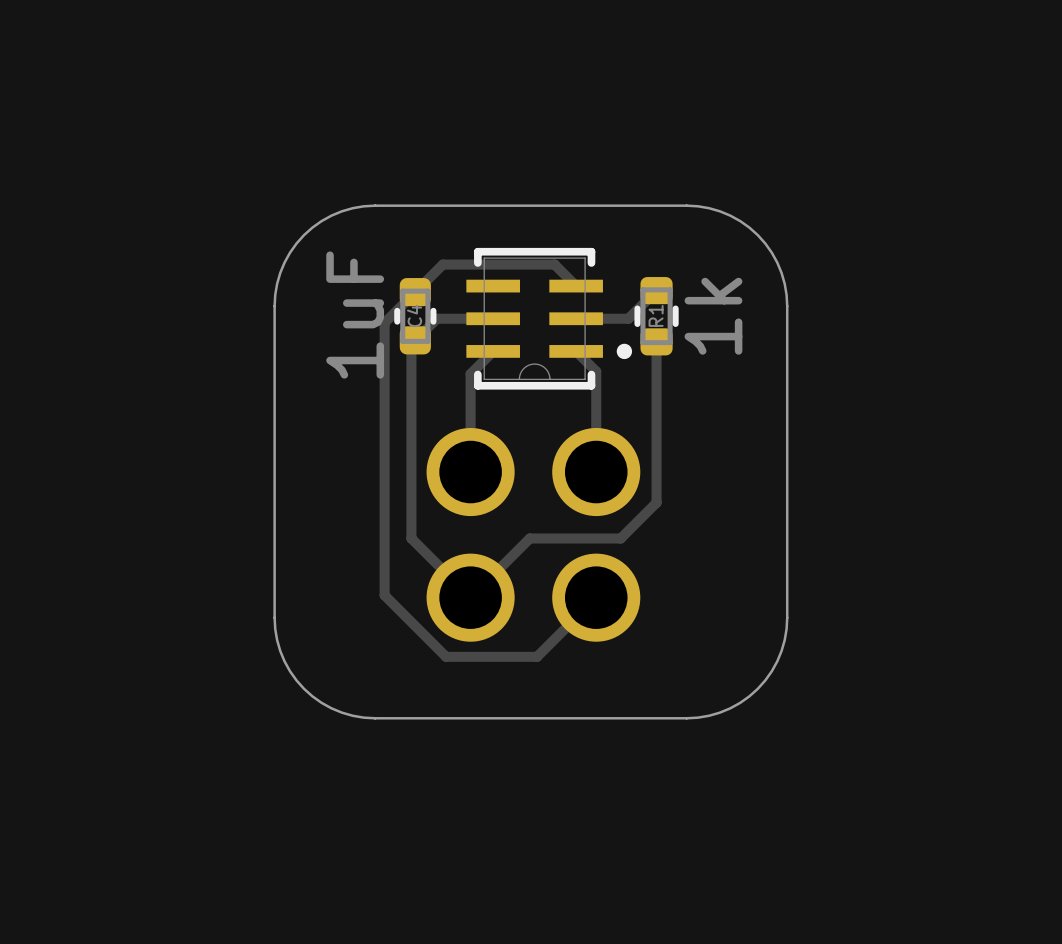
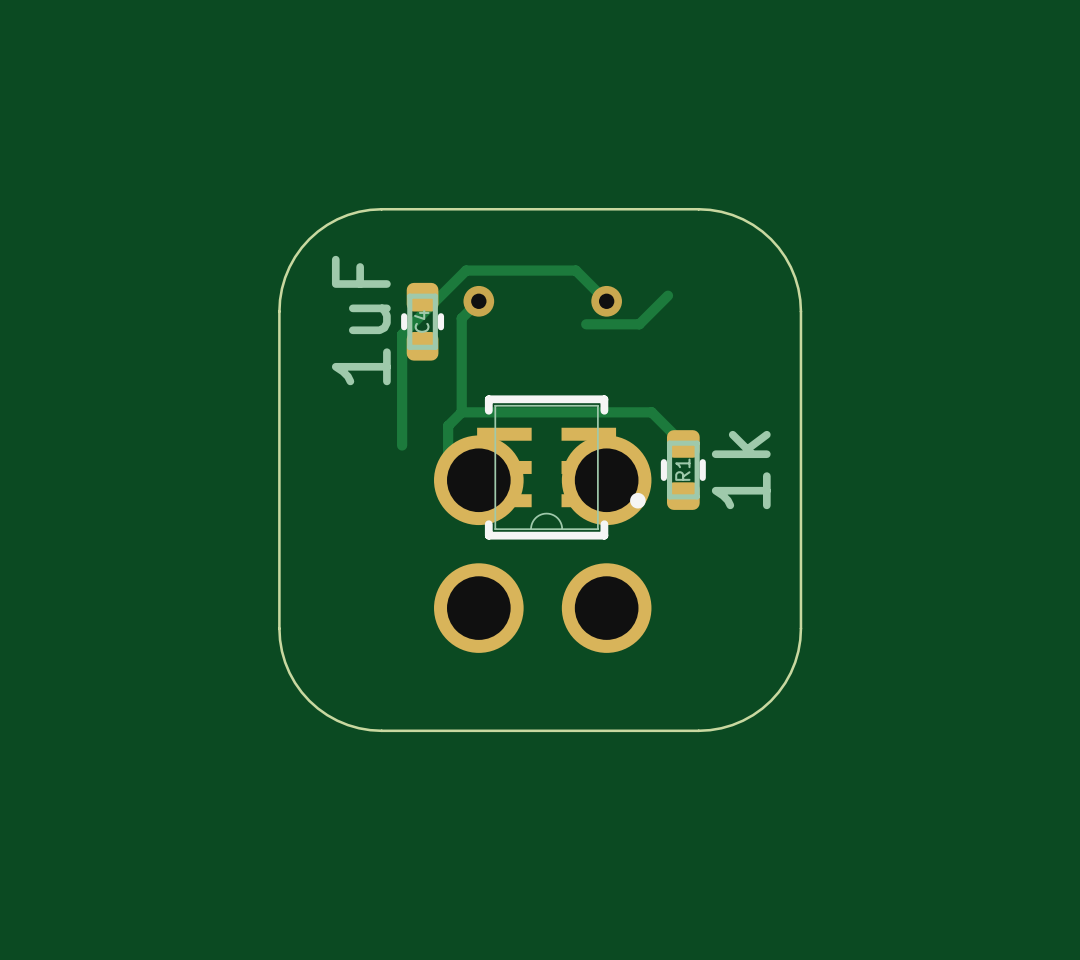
track: (576, 286) (554, 264) (442, 264) (384, 322) (384, 595) (446, 656) (537, 656) (596, 597) -> none
track: none -> (478, 301) (461, 318) (461, 412)
via: none -> (478, 301)
track: none -> (606, 301) (575, 270) (466, 270) (402, 334) (402, 445)
via: none -> (606, 301)
R1 position: (656, 316) -> (683, 470)
track: (493, 318) (436, 318) (411, 344) (411, 538) (470, 597) (529, 538) (620, 538) (656, 502) (656, 341) -> none
part position: (549, 318) -> (561, 467)
track: (493, 351) (470, 373) (470, 472) -> none
track: (576, 351) (596, 371) (596, 472) -> none
track: none -> (461, 412) (651, 412) (683, 443)
track: none -> (461, 412) (448, 425) (448, 467)

